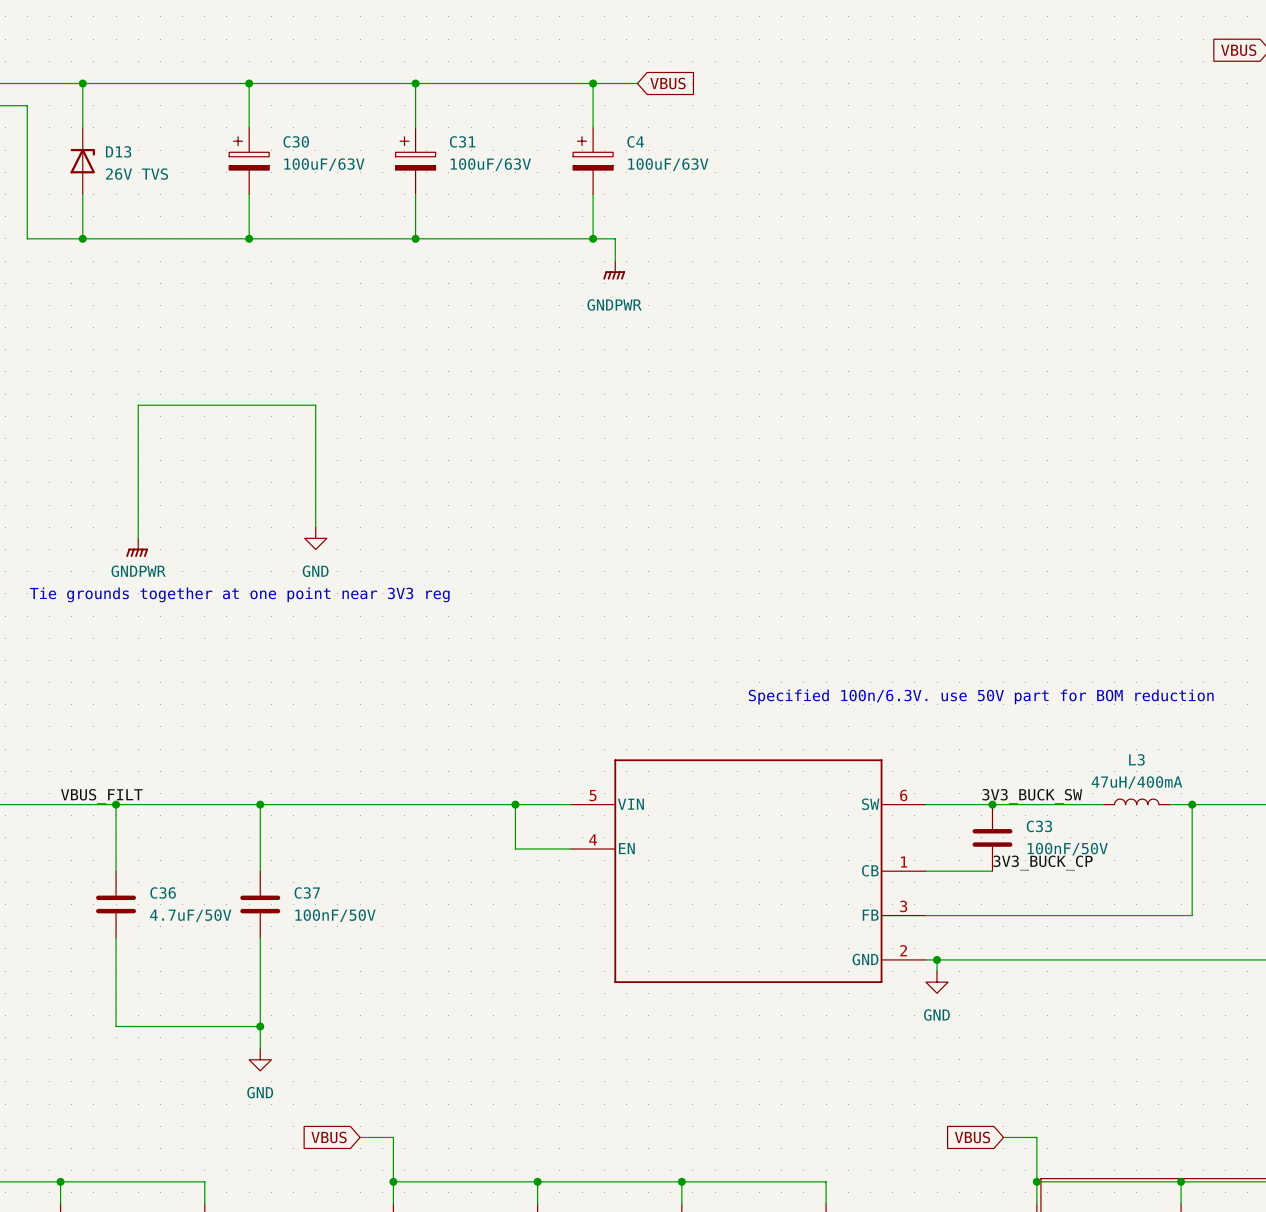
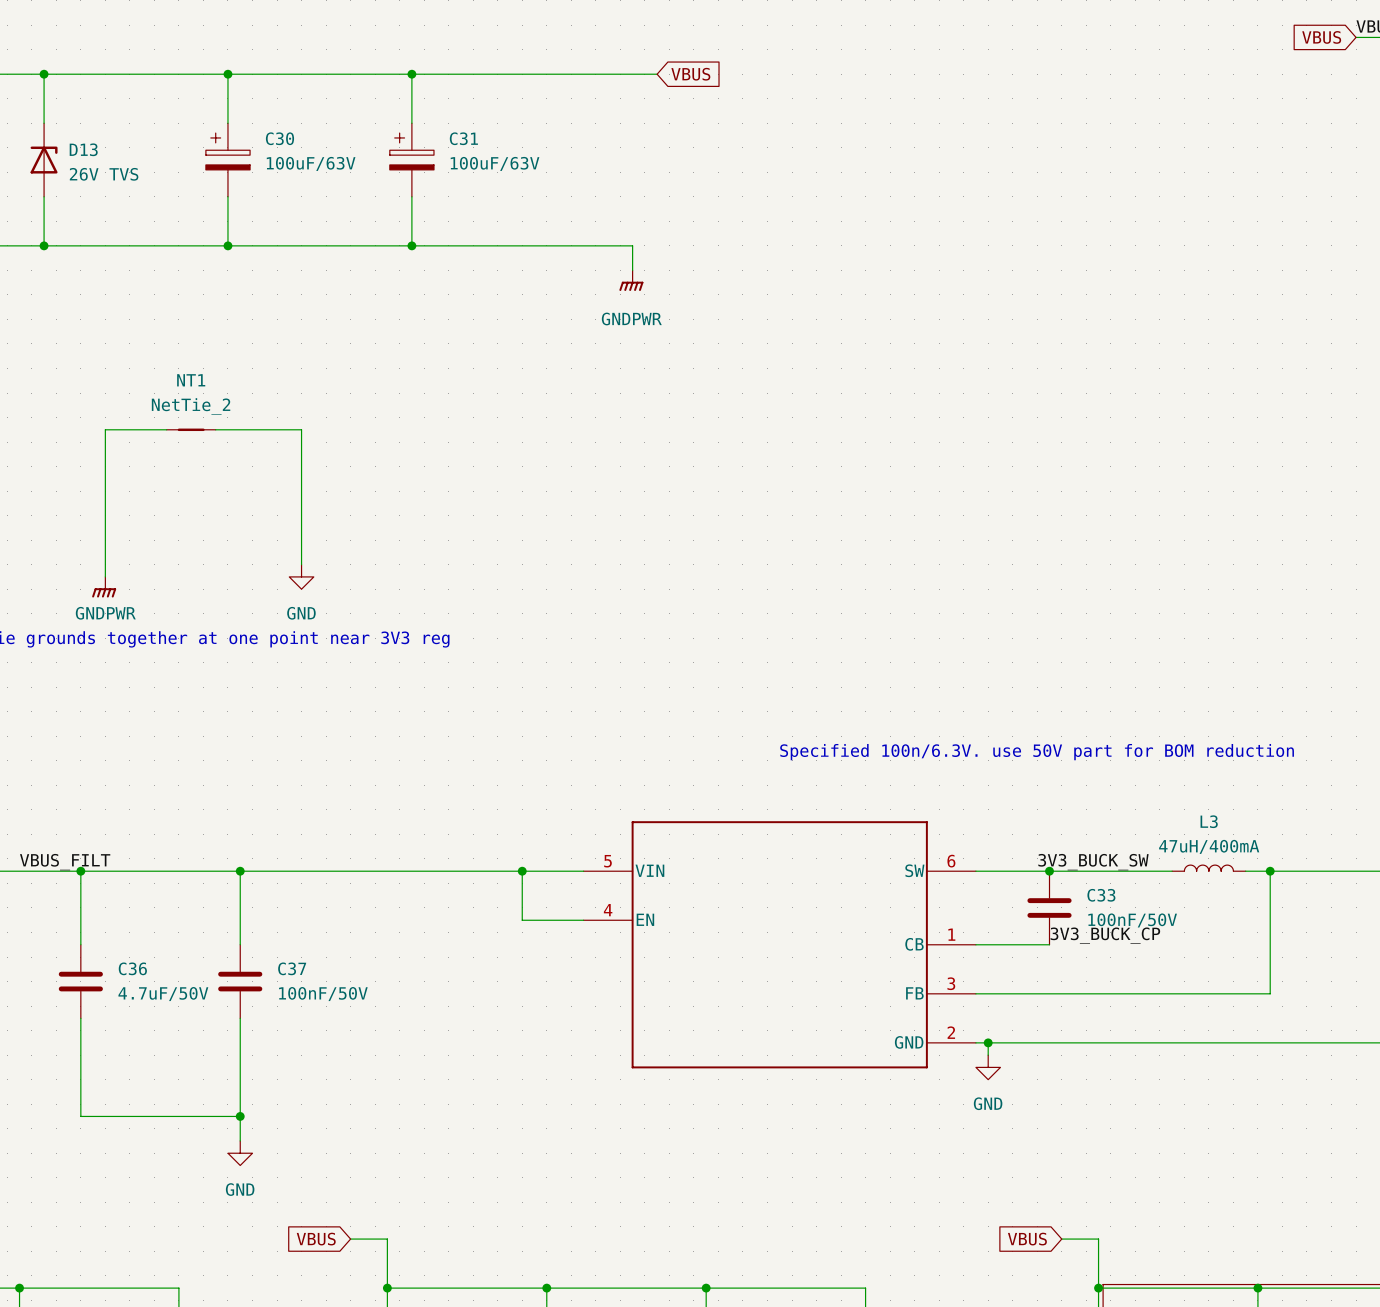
wire: (593, 83) (593, 127) -> none
junction: (593, 83) -> none
C4: 100uF/63V (593, 161) -> none
wire: (593, 194) (593, 238) -> none
junction: (593, 238) -> none
NT1: none -> NetTie_2 (191, 429)

